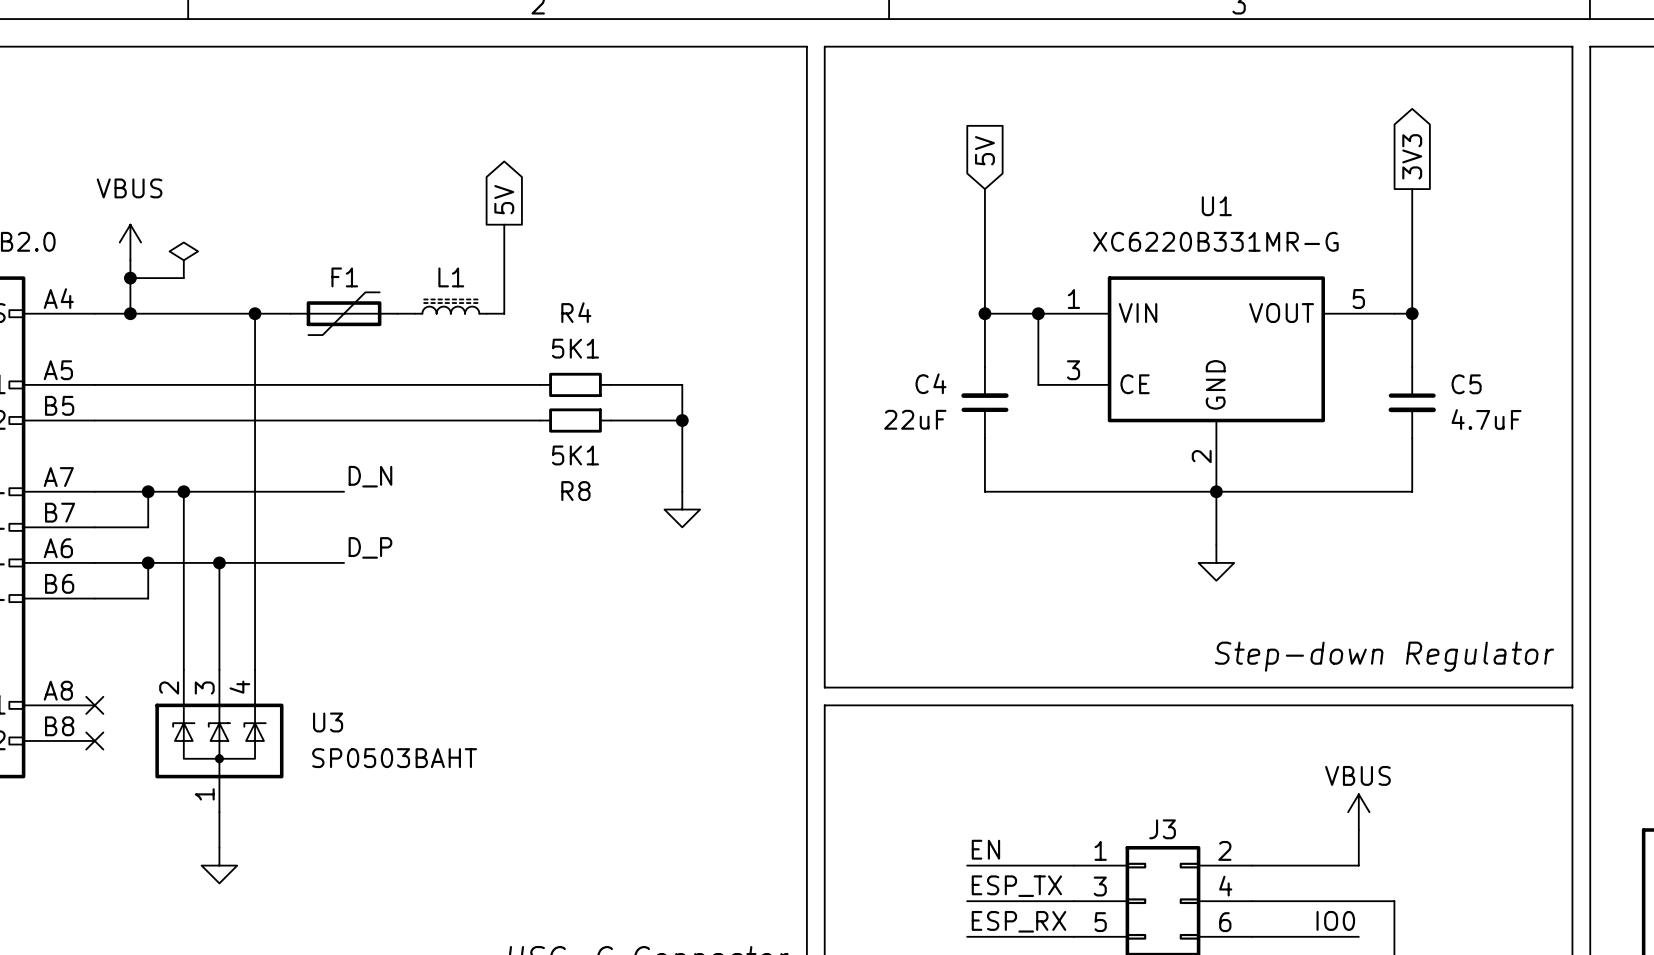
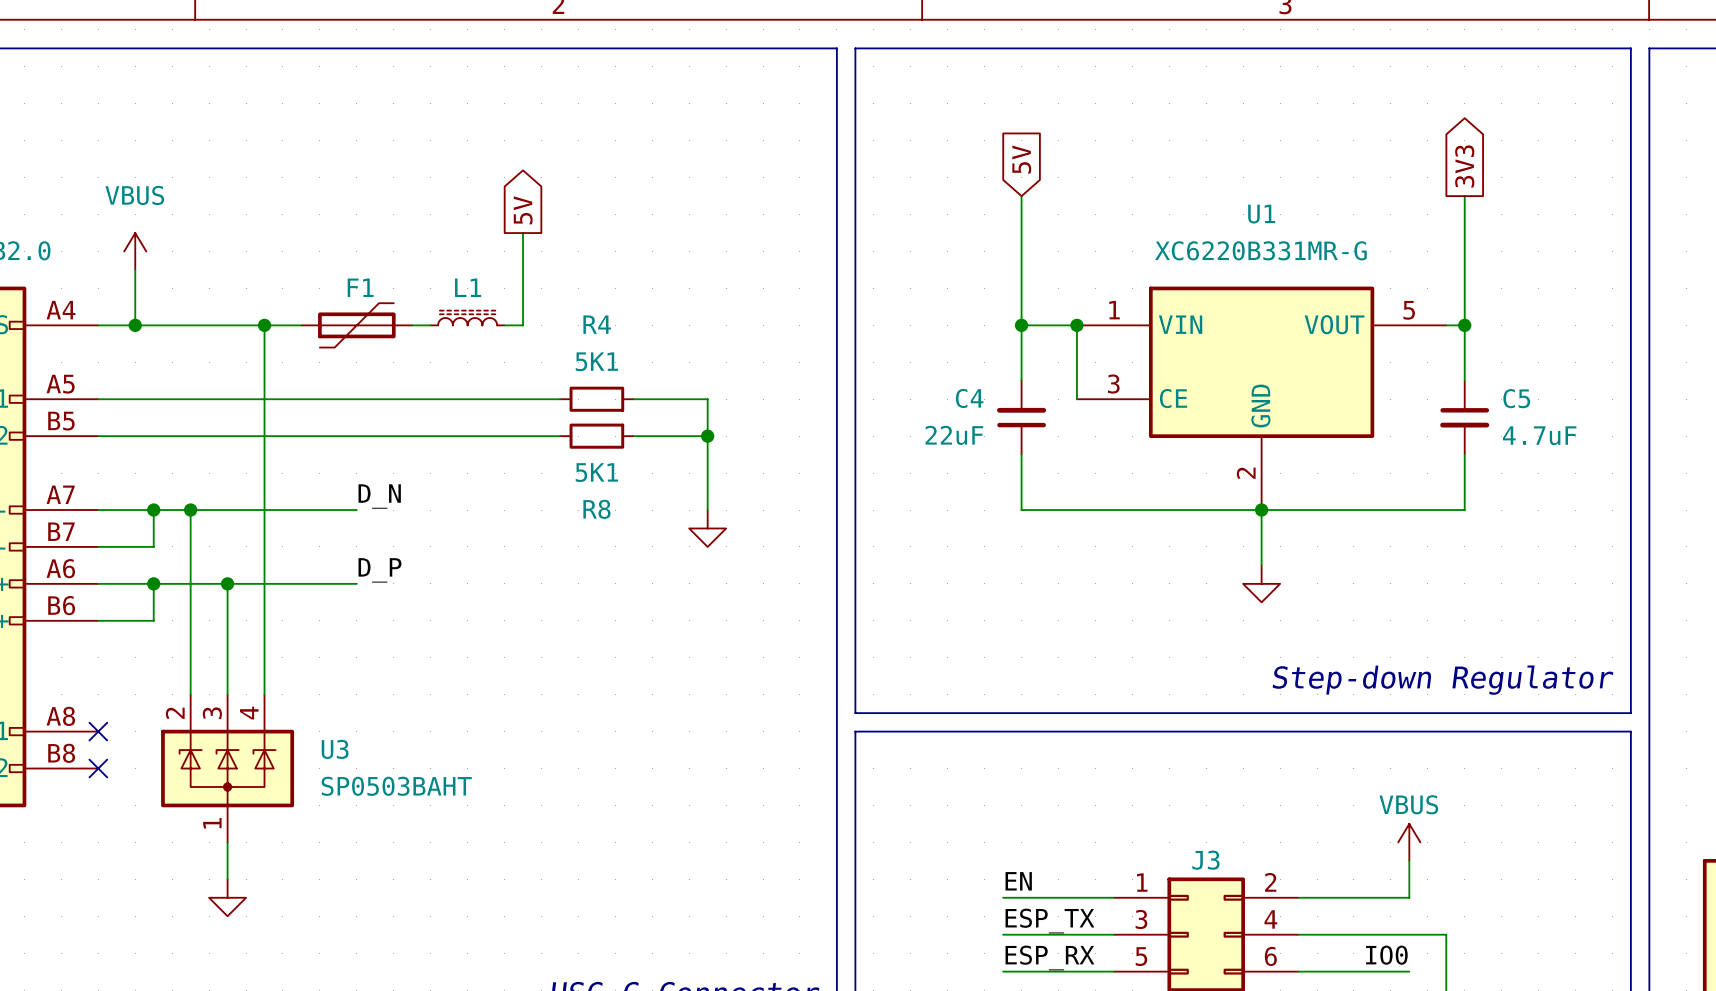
power symbol: (183, 260) -> none
wire: (130, 278) (183, 278) -> none
junction: (130, 278) -> none

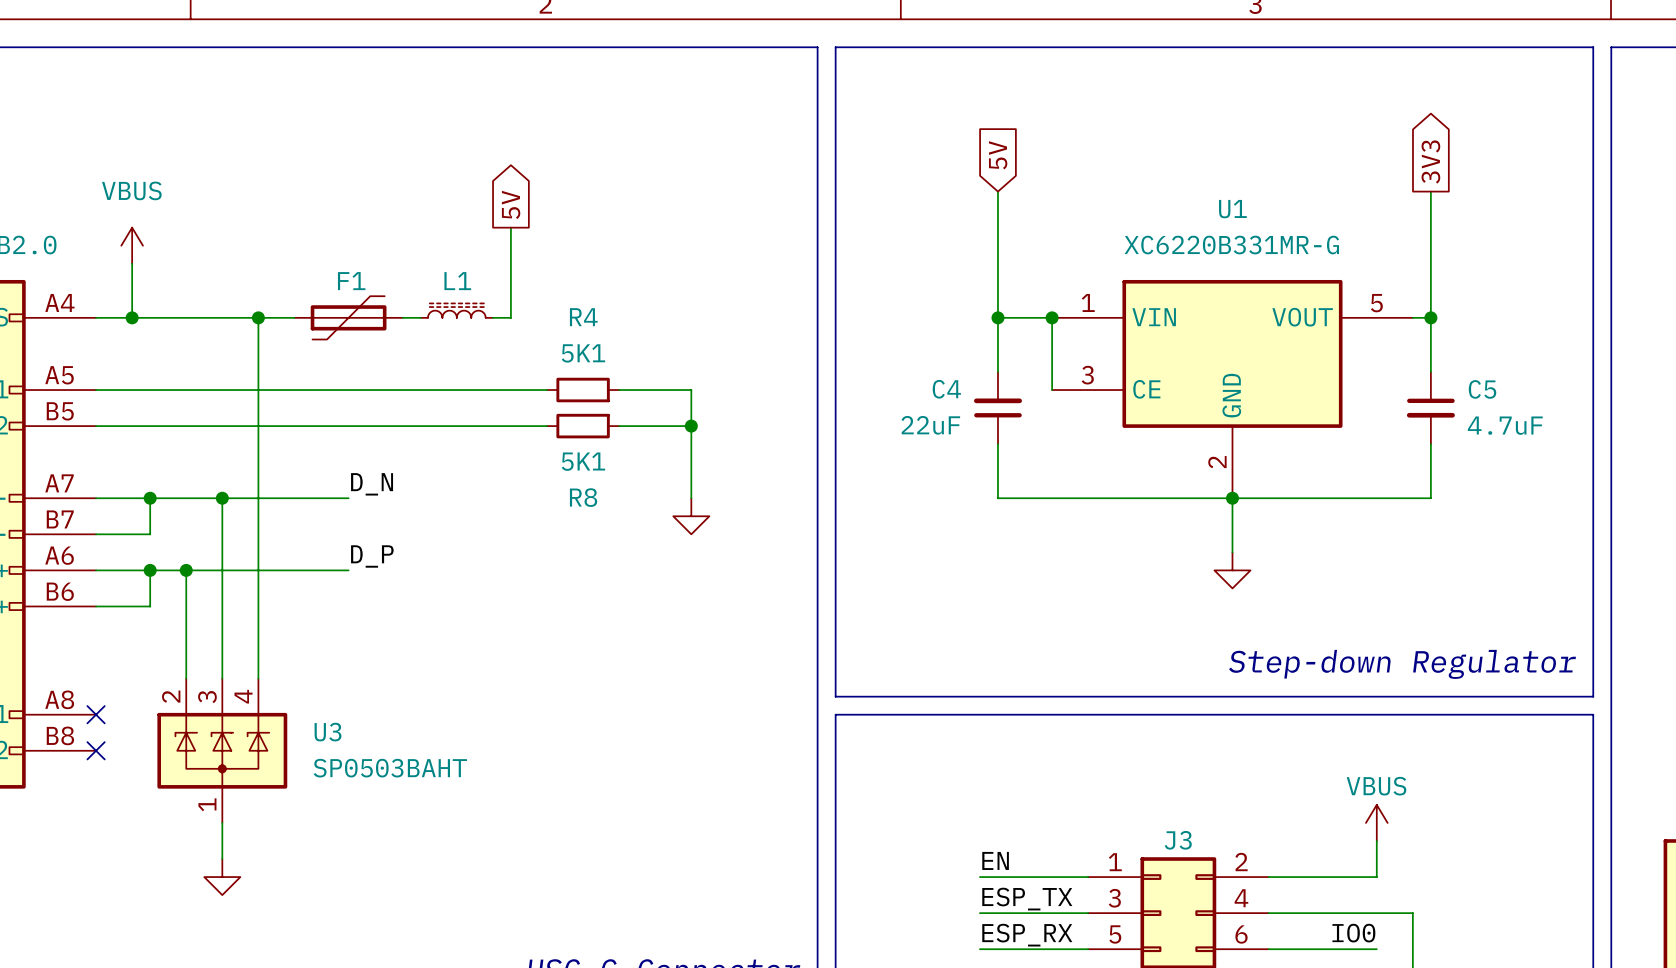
wire: (190, 510) (190, 583) -> (222, 498) (222, 570)
junction: (190, 510) -> none
junction: none -> (222, 498)
junction: none -> (186, 570)
junction: (227, 583) -> none

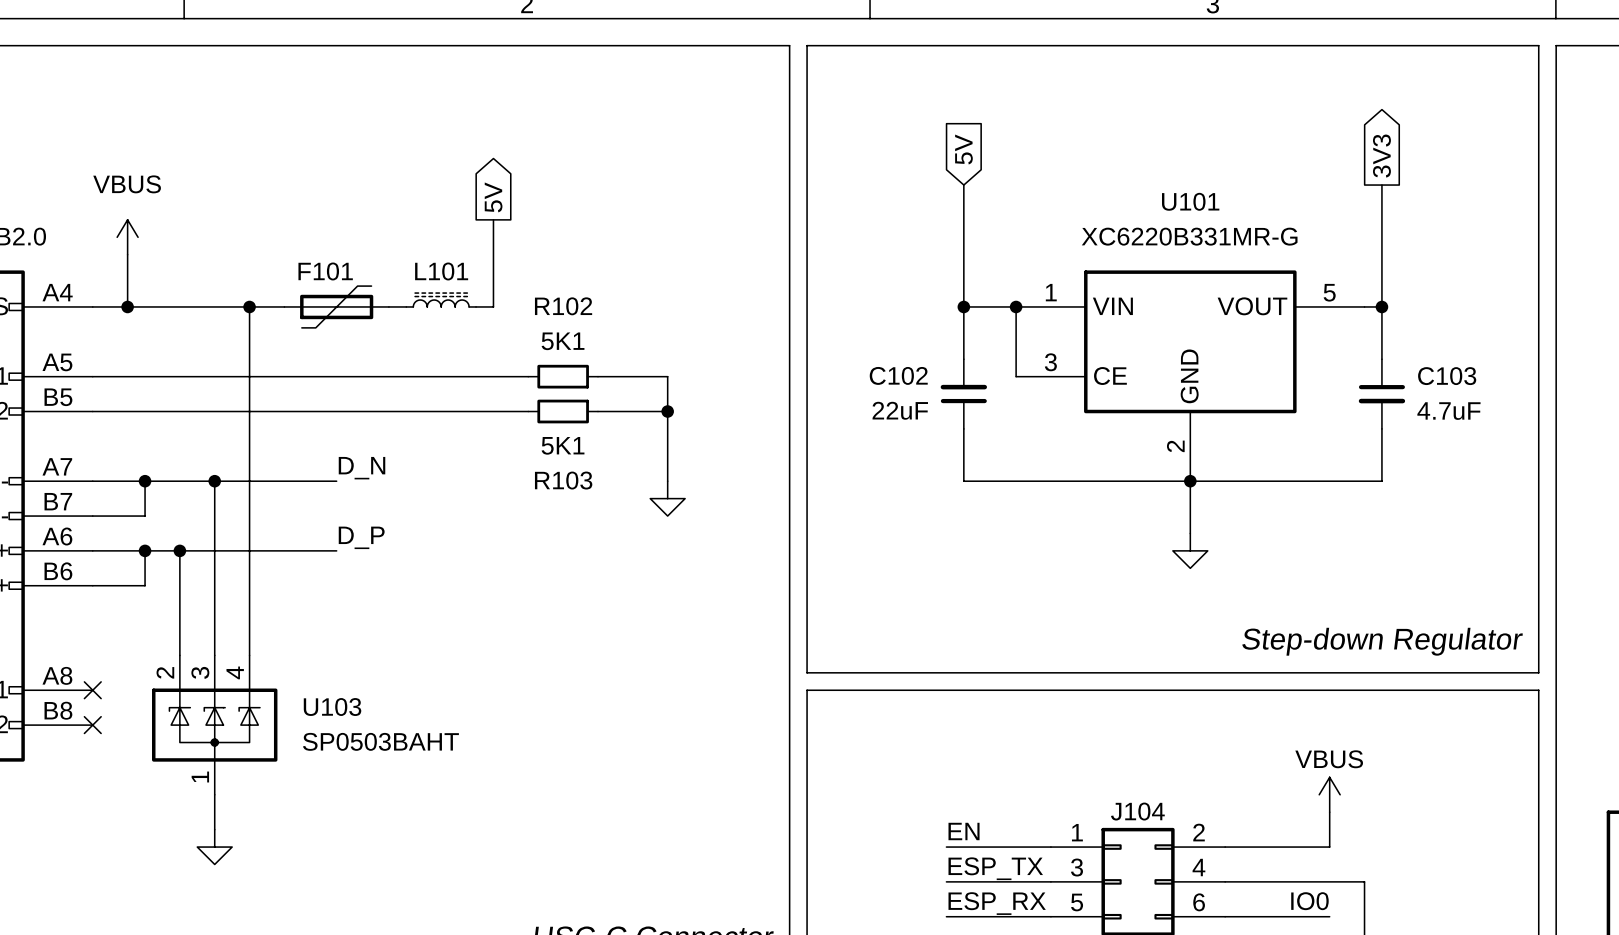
U1 name: U1 (1232, 209) -> U101 (1190, 201)
F1 name: F1 (351, 281) -> F101 (325, 271)
L1 name: L1 (457, 281) -> L101 (441, 271)
R4 name: R4 (583, 317) -> R102 (563, 306)
C4 name: C4 (946, 389) -> C102 (898, 375)
C5 name: C5 (1482, 389) -> C103 (1447, 376)
R8 name: R8 (583, 497) -> R103 (563, 480)
U3 name: U3 (328, 732) -> U103 (332, 707)
J3 name: J3 (1178, 840) -> J104 (1137, 811)

